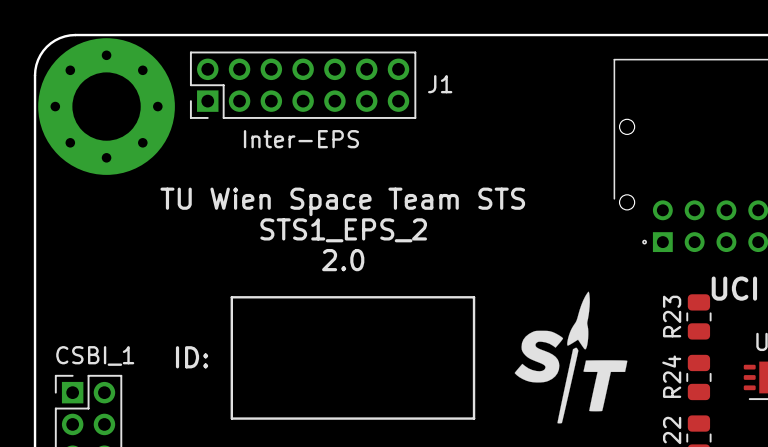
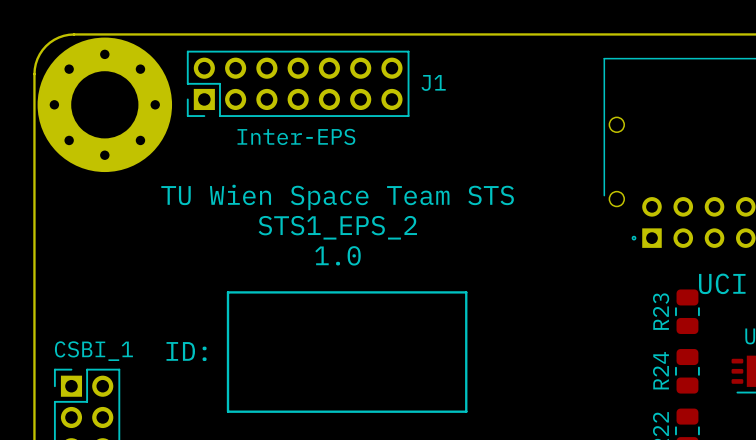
text: 2.0 (343, 260) -> 1.0 (337, 255)
drawing: [514, 291, 628, 424] -> none

